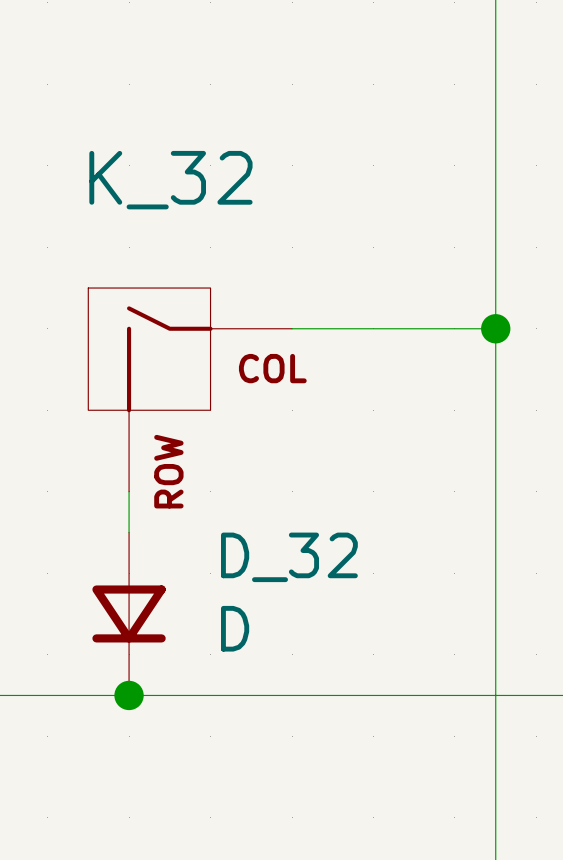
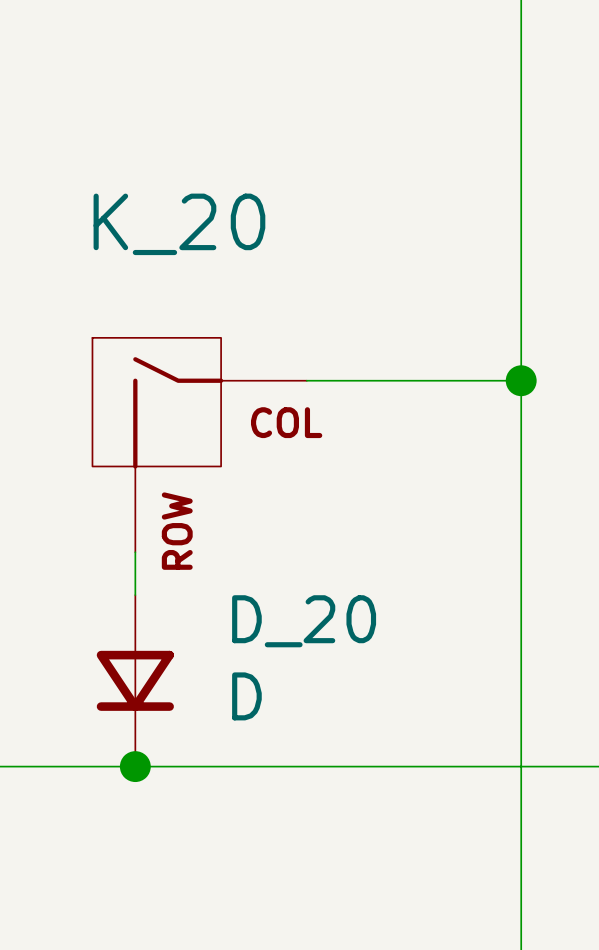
K_32 name: K_32 (170, 180) -> K_20 (179, 224)
D_32 name: D_32 (289, 557) -> D_20 (304, 621)

